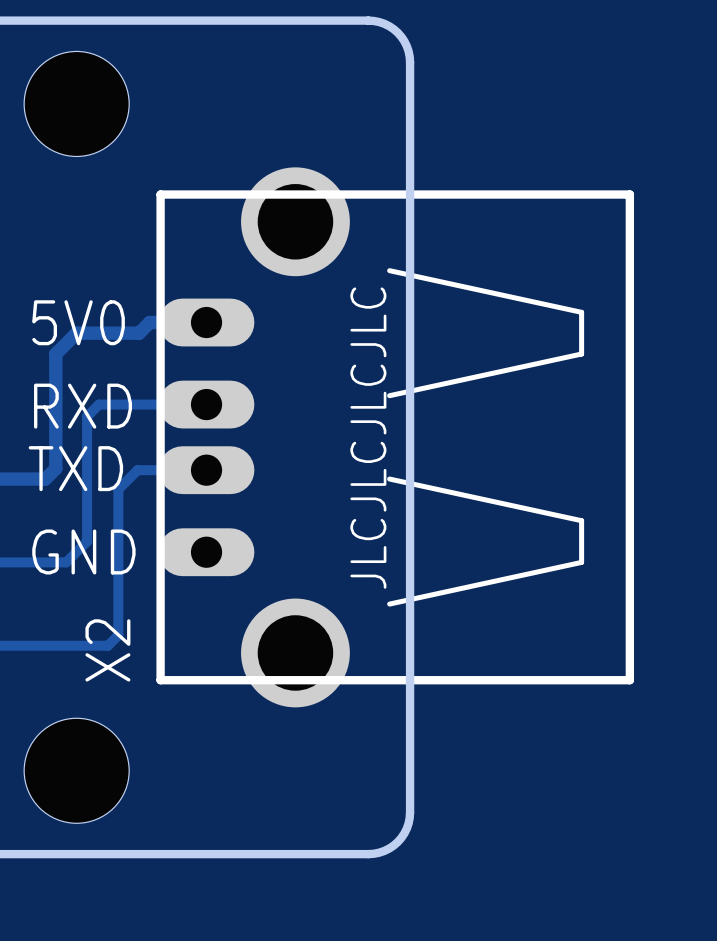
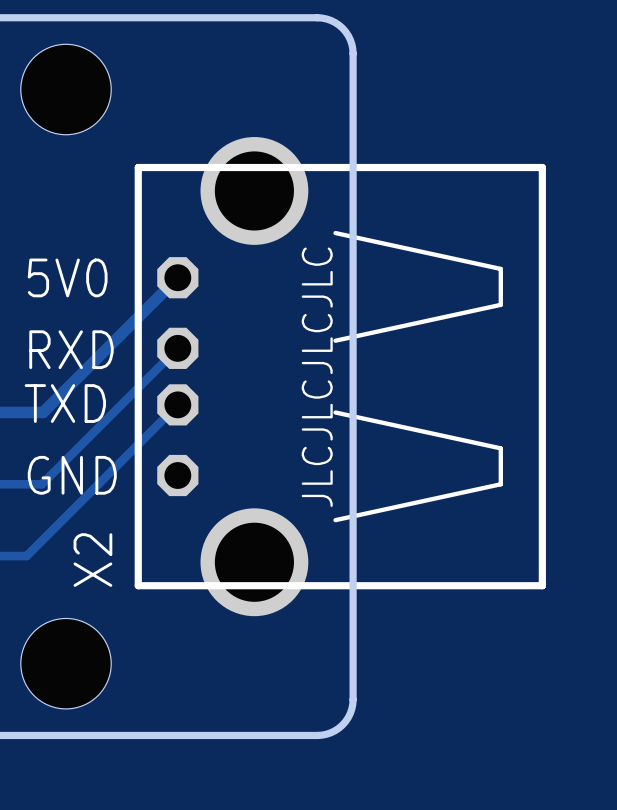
X2 footprint: [156, 167, 635, 708] -> [134, 137, 546, 617]
track: (206, 322) (149, 322) (139, 333) (76, 333) (55, 354) (55, 468) (45, 479) -> (177, 277) (43, 412) (39, 412)
track: (206, 404) (99, 404) (87, 416) (87, 541) (66, 562) (48, 562) -> (177, 348) (41, 484)
track: (206, 470) (137, 470) (118, 489) (118, 635) (107, 645) (30, 645) -> (177, 404) (26, 556)

